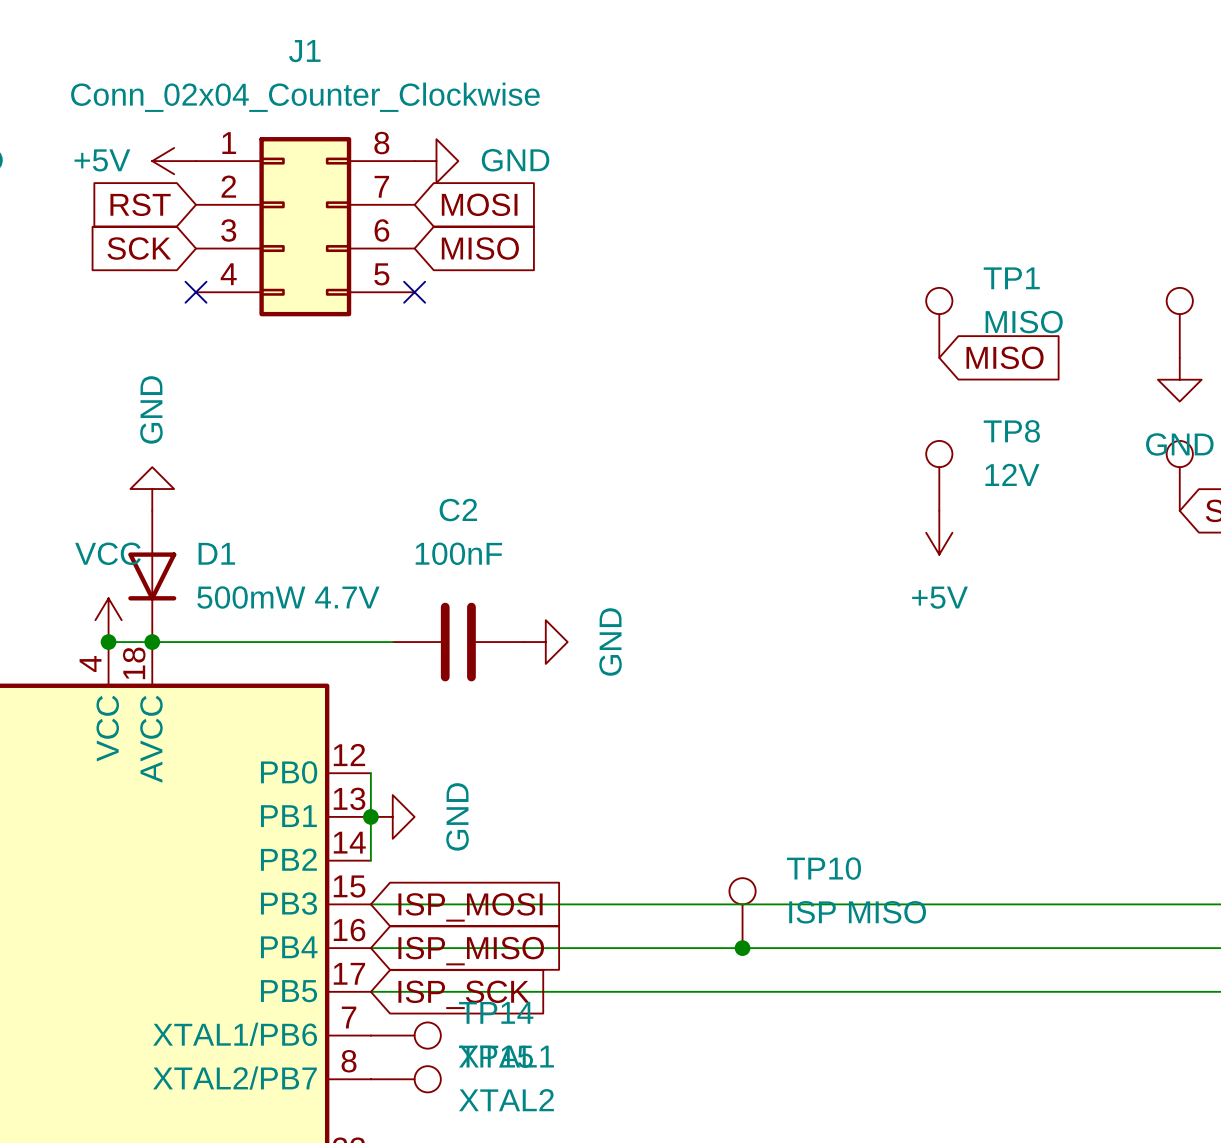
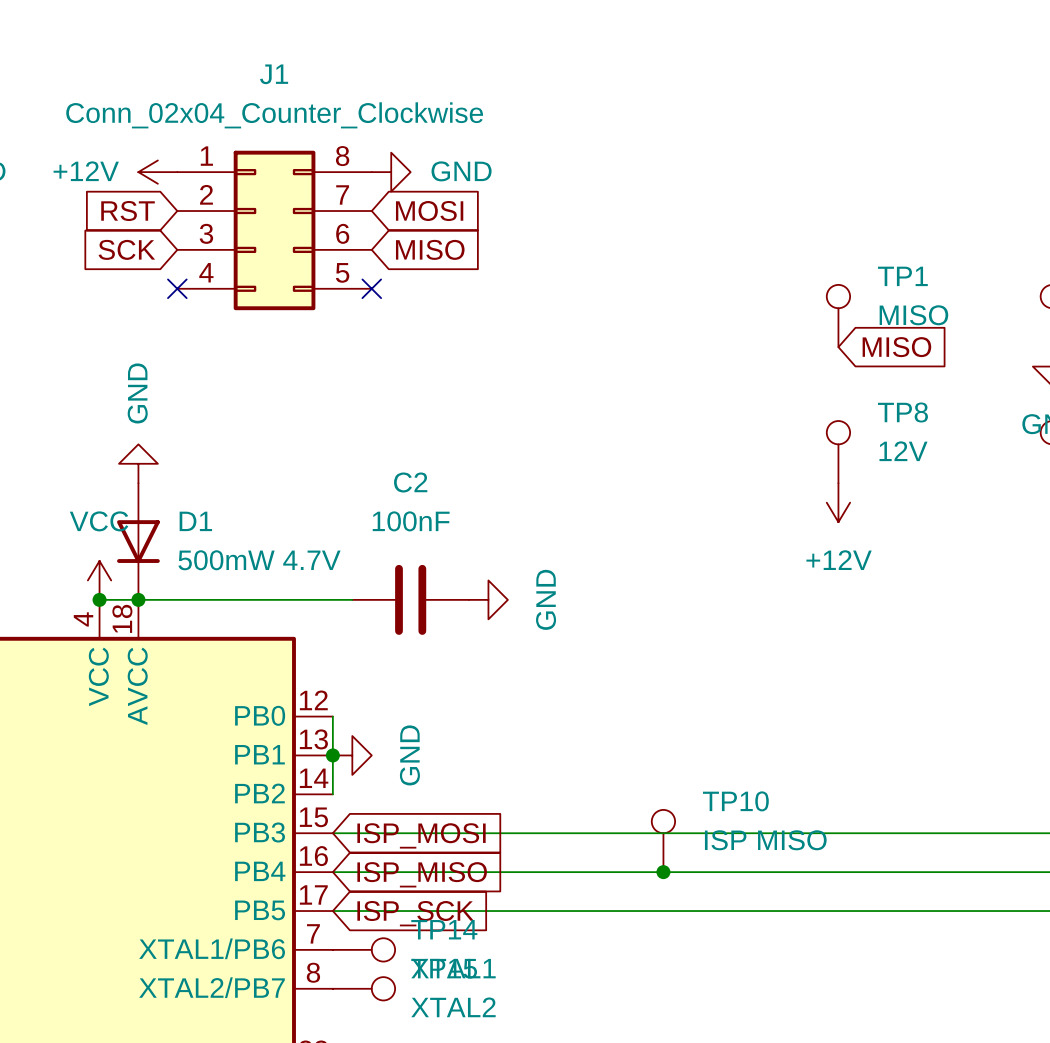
power symbol: +5V (174, 161) -> +12V (157, 172)
power symbol: +5V (939, 532) -> +12V (838, 502)

